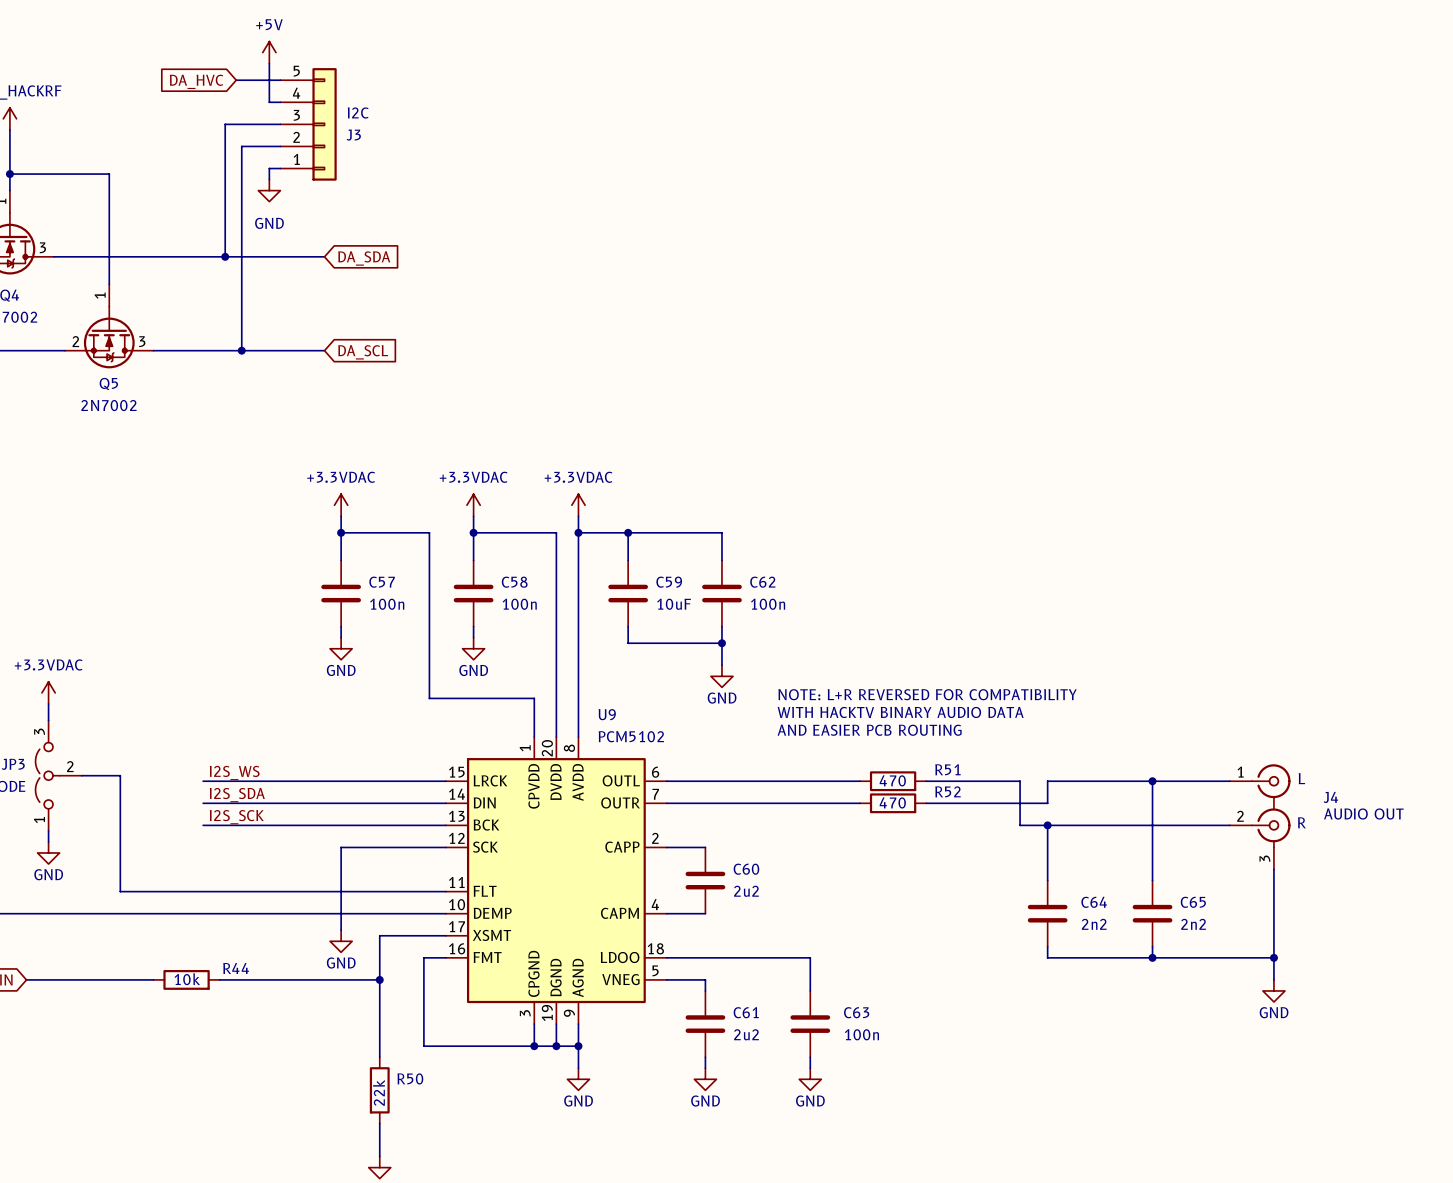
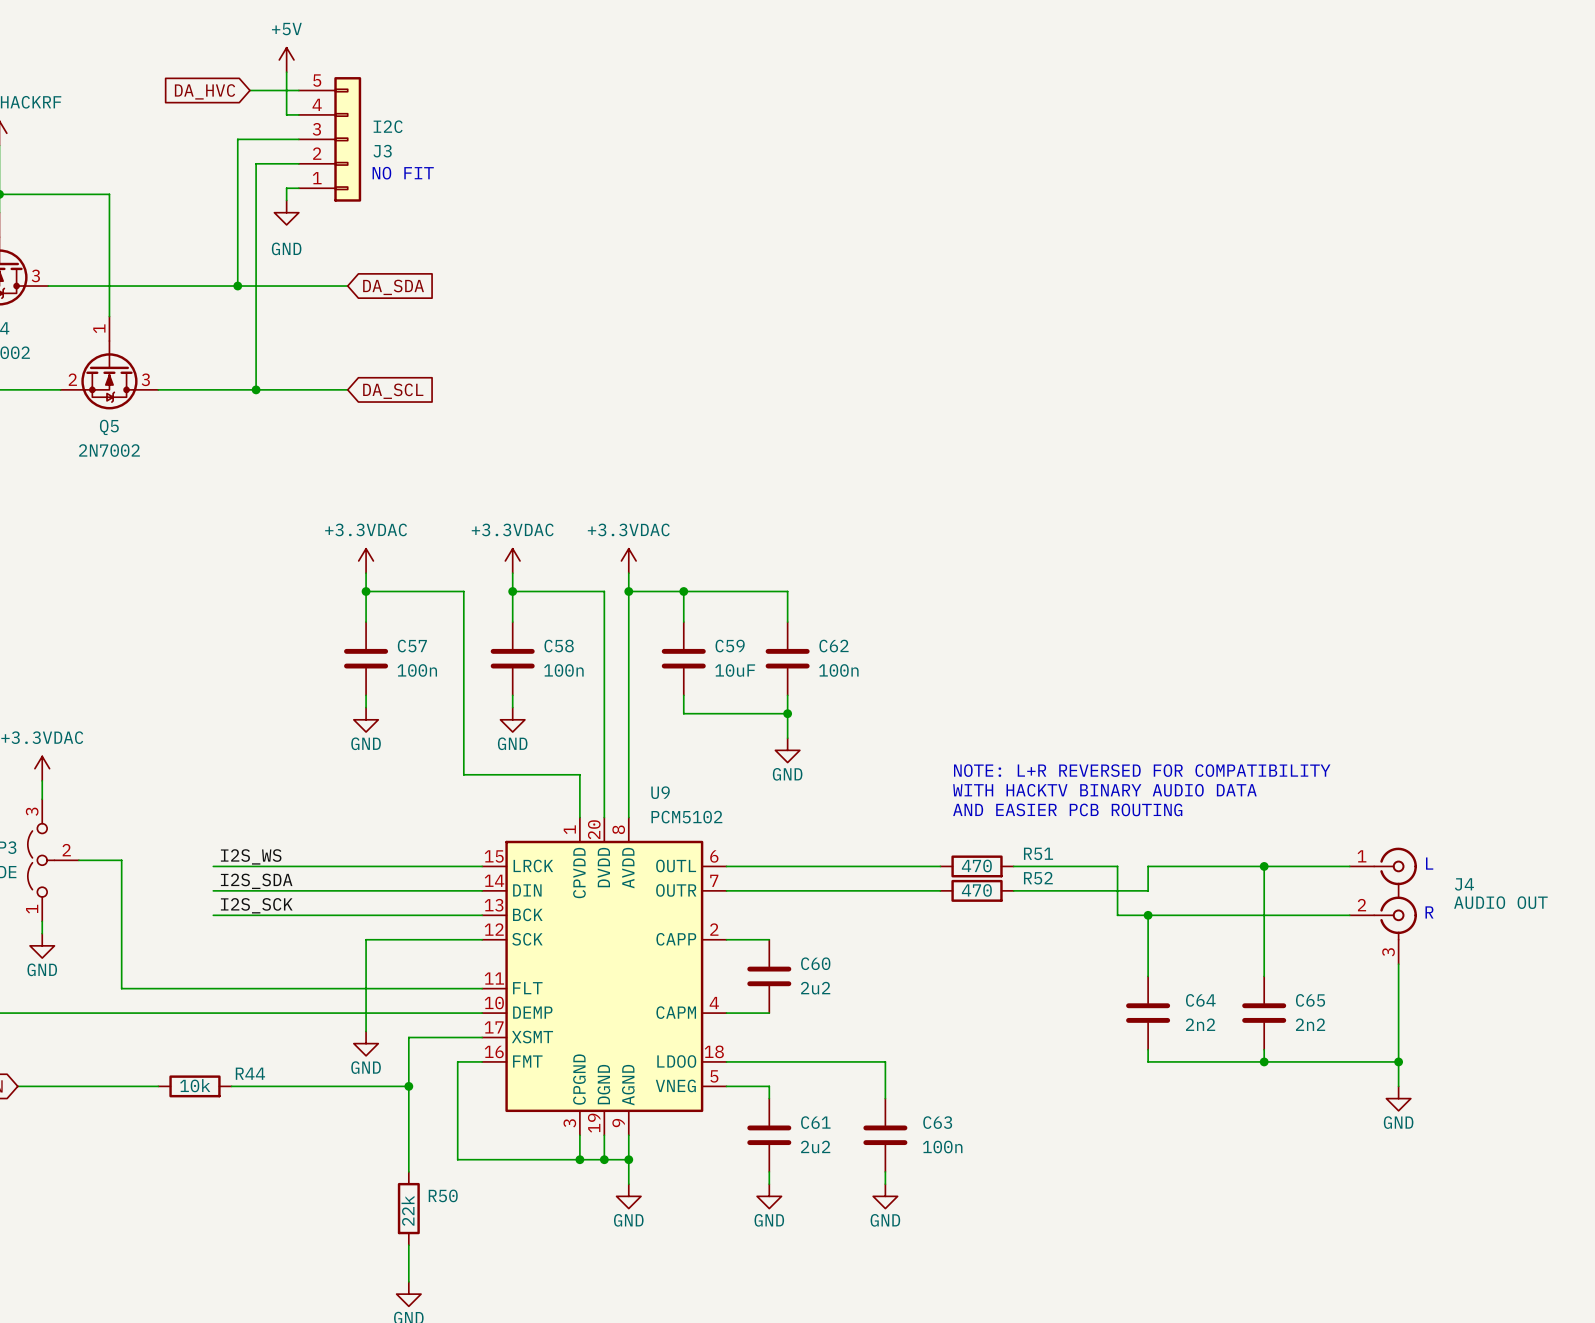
text: none -> NO FIT (403, 173)
text position: NOTE: L+R REVERSED FOR COMPATIBILITY (927, 694) -> NOTE: L+R REVERSED FOR COMPATIBILITY (1142, 770)
text position: WITH HACKTV BINARY AUDIO DATA (900, 712) -> WITH HACKTV BINARY AUDIO DATA (1104, 790)
text position: AND EASIER PCB ROUTING (869, 730) -> AND EASIER PCB ROUTING (1067, 809)

